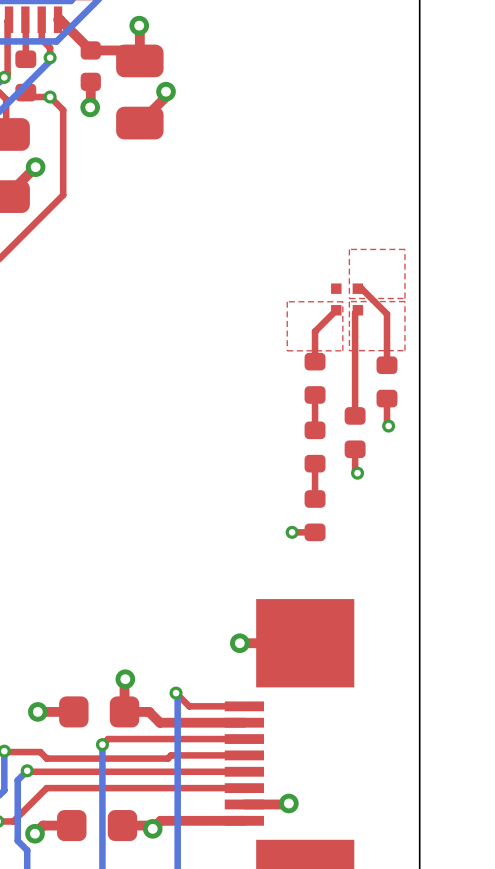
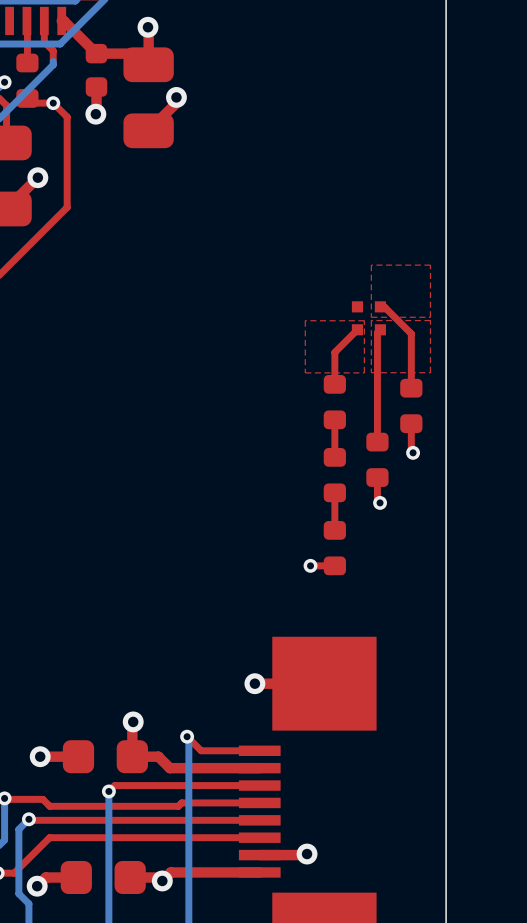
top track: (9, 19) (7, 74) (4, 77) -> none
via: (50, 57) -> none

